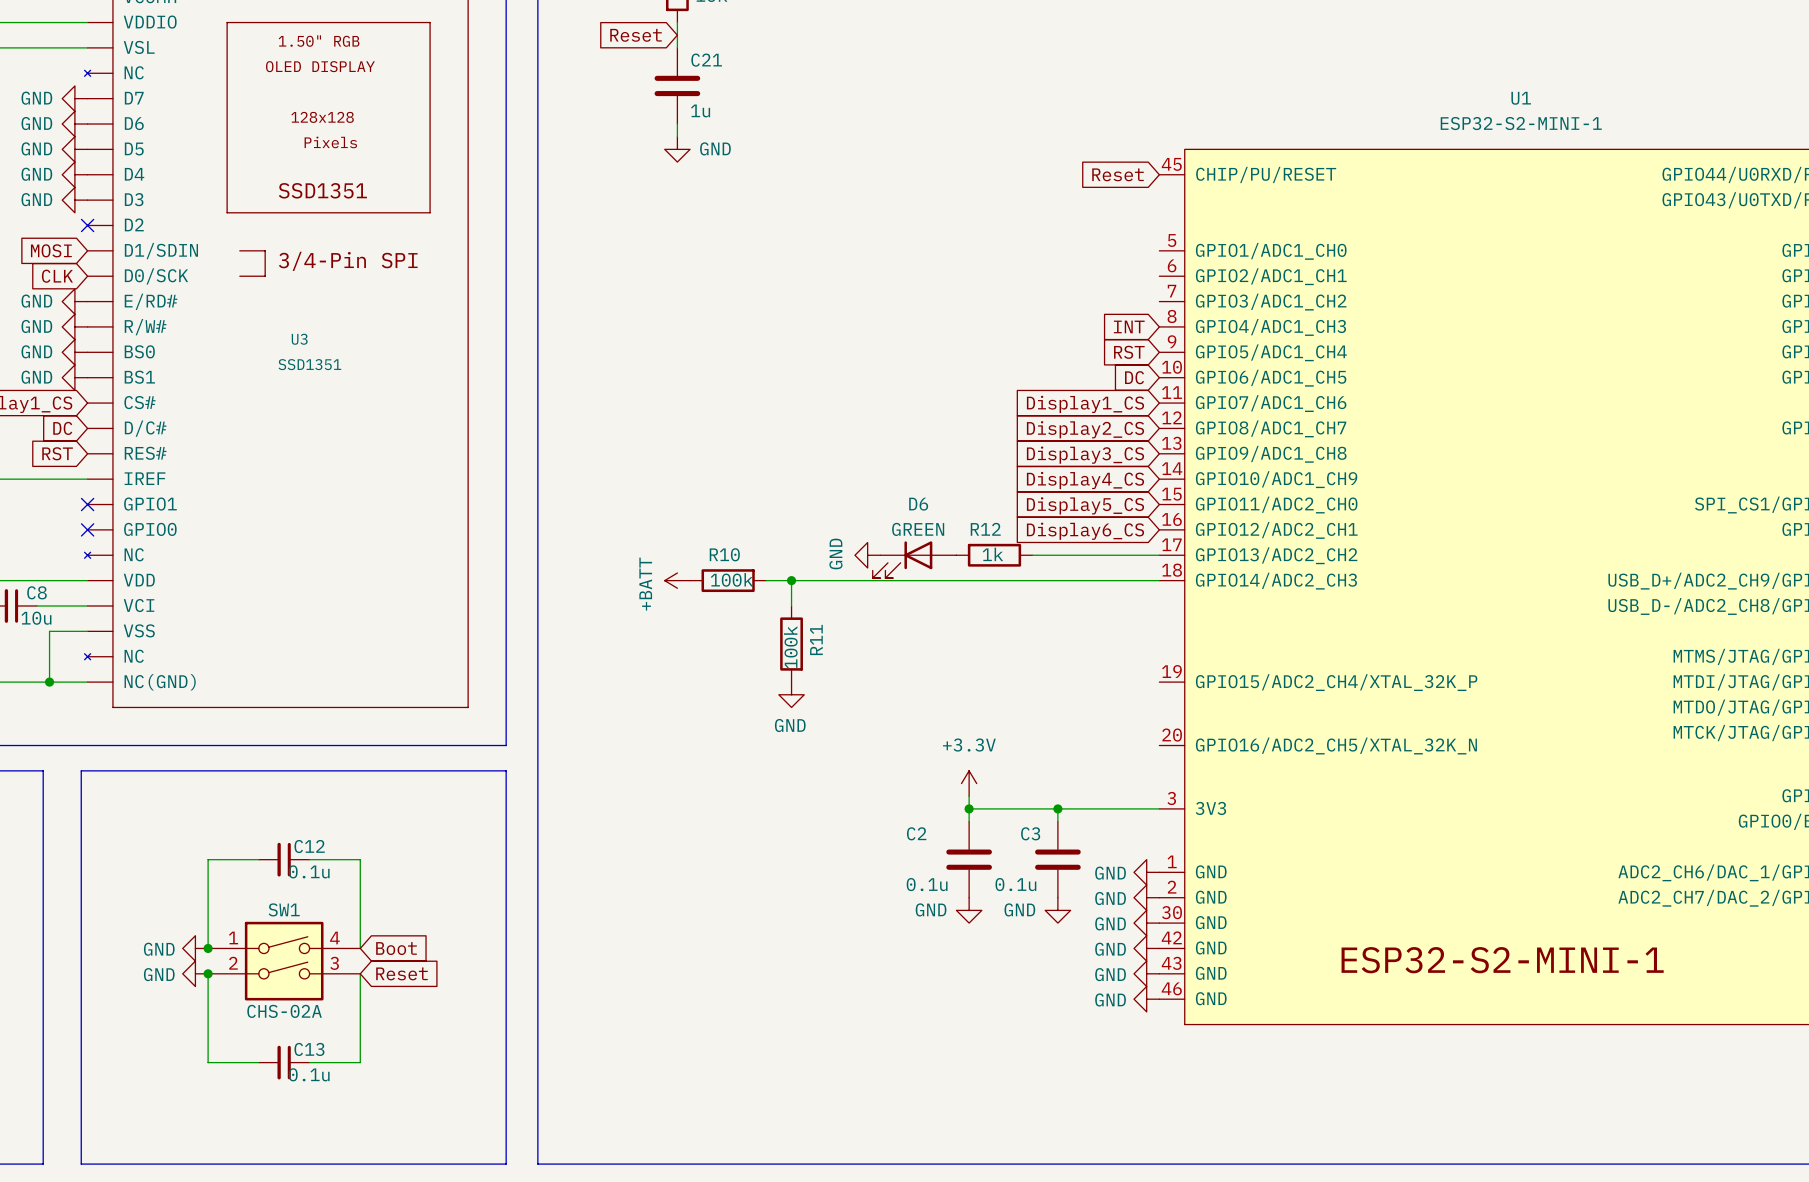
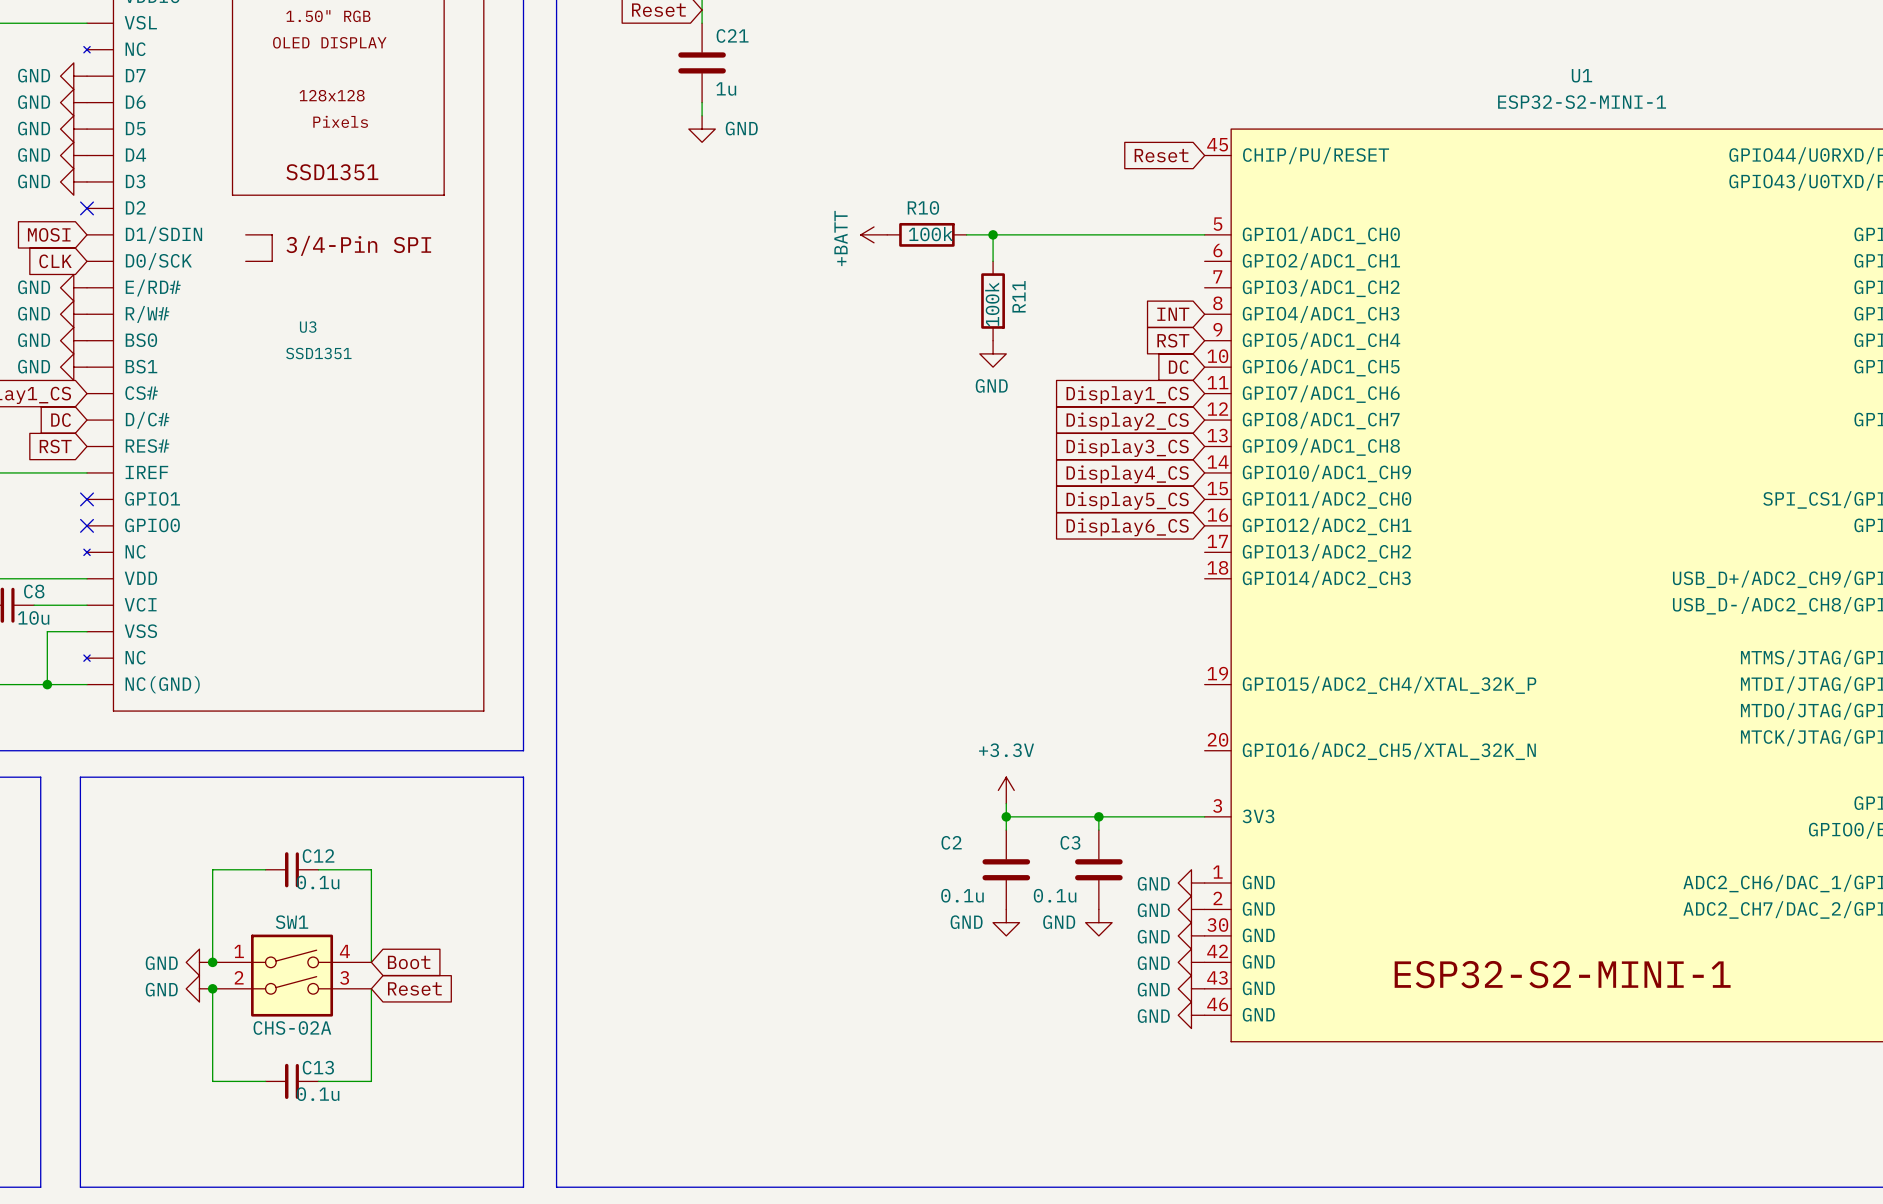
power symbol: none -> +BATT (874, 234)
wire: none -> (966, 234) (1204, 234)
wire: none -> (993, 234) (993, 261)
junction: none -> (993, 234)
power symbol: none -> GND (993, 353)
power symbol: GND (867, 555) -> none
R12: 1k (994, 555) -> none
wire: (1032, 555) (1159, 555) -> none
D6: GREEN (914, 559) -> none
power symbol: +BATT (677, 580) -> none
R10 position: (728, 580) -> (926, 234)
wire: (766, 580) (1159, 580) -> none
wire: (791, 580) (791, 605) -> none
junction: (791, 580) -> none
R11 position: (791, 644) -> (993, 301)
power symbol: GND (791, 694) -> none

